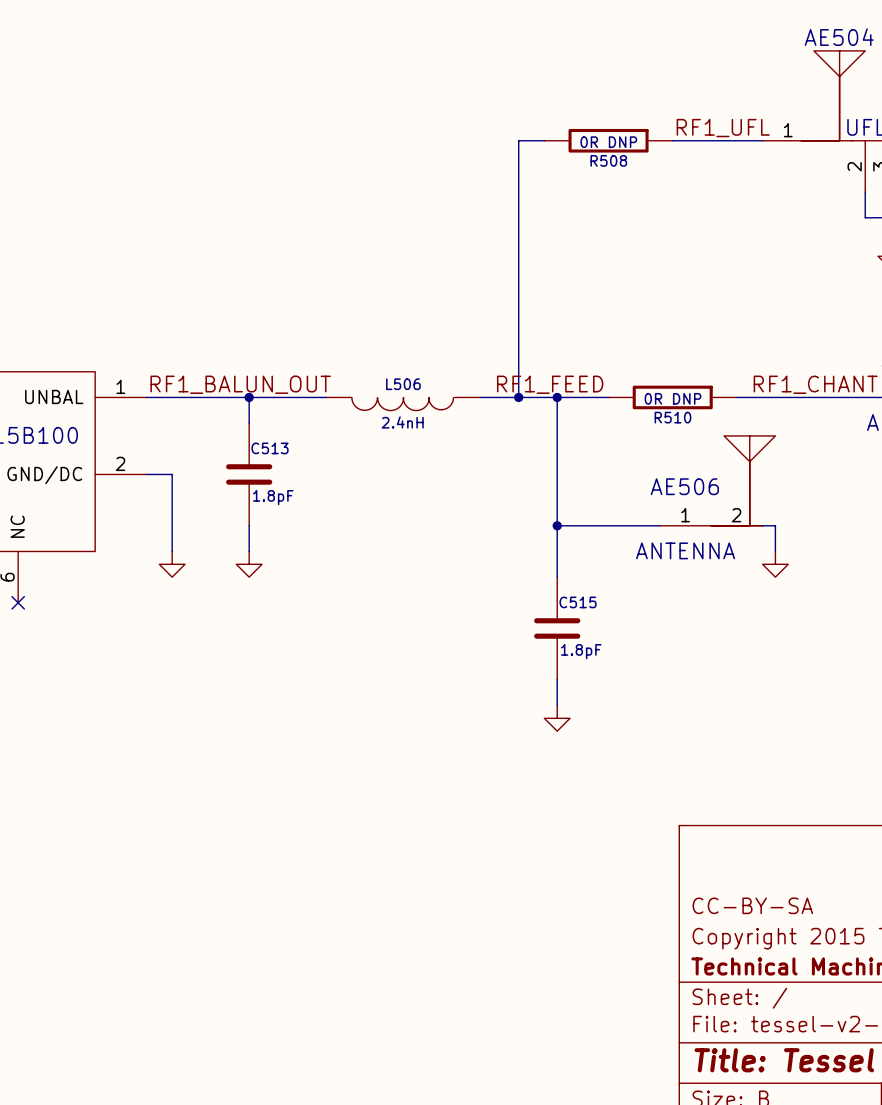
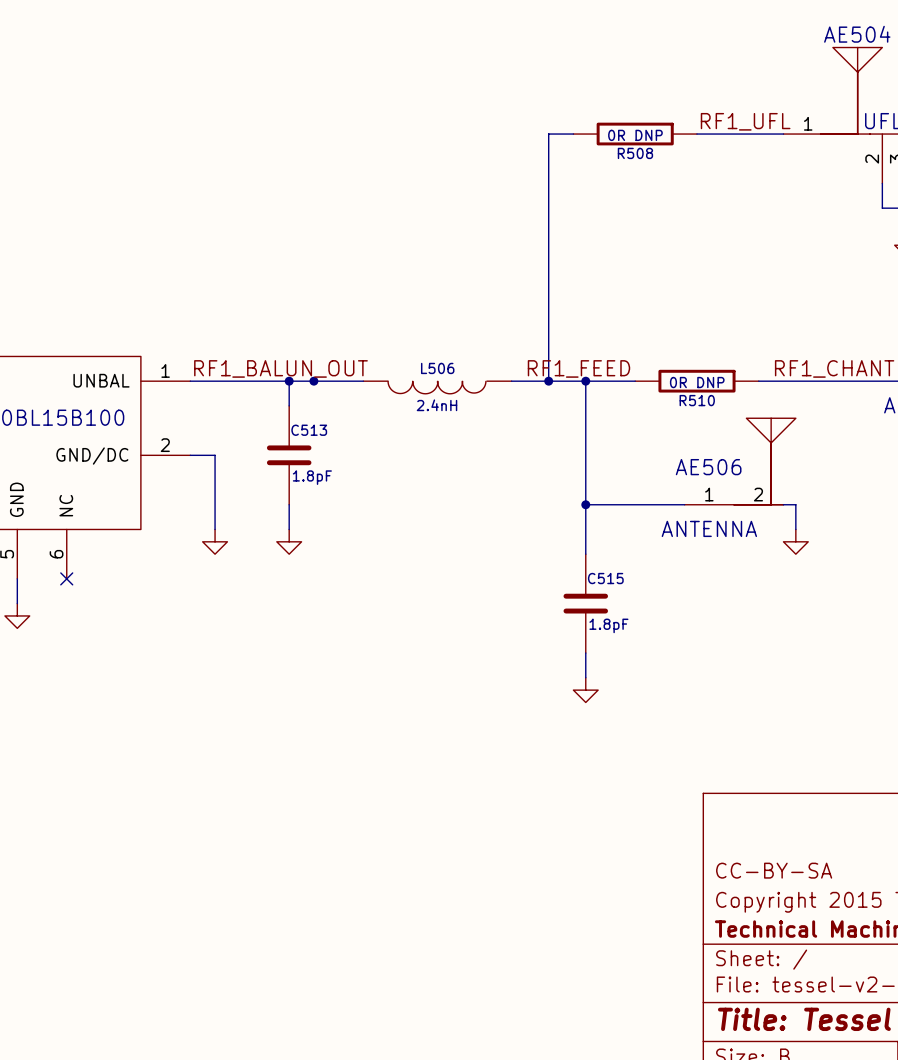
junction: none -> (313, 381)

